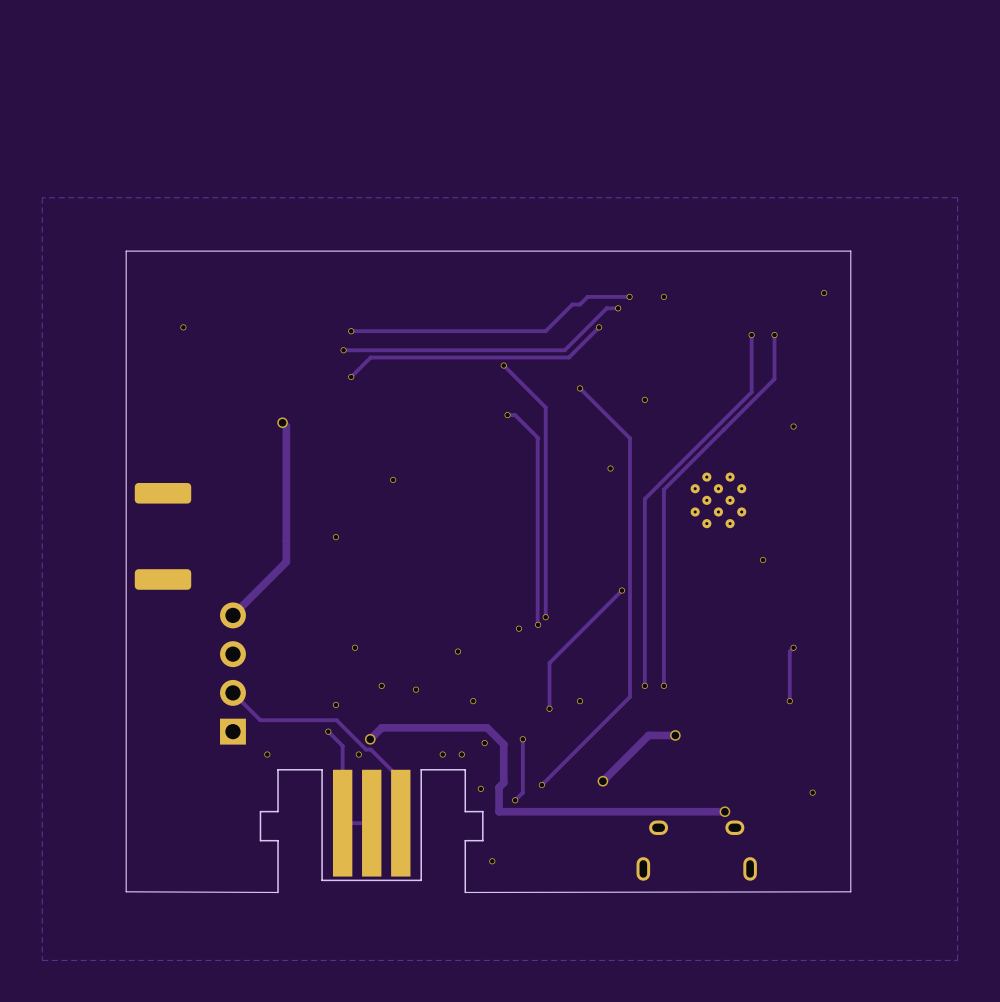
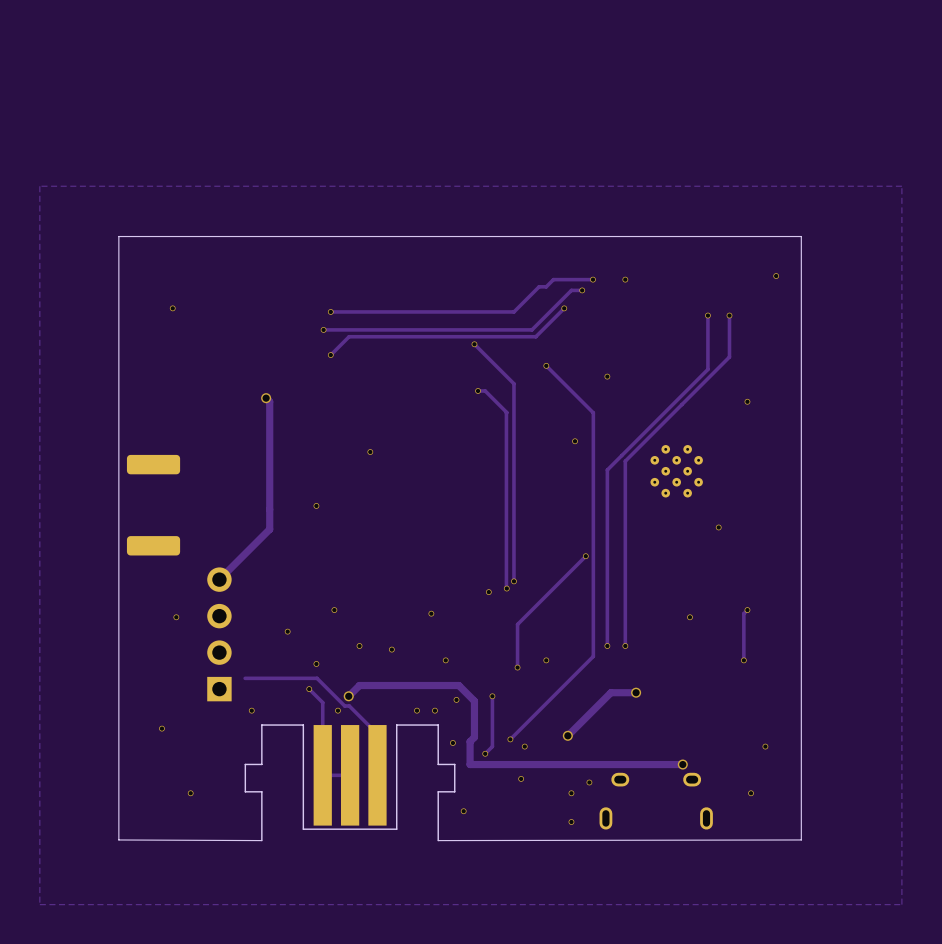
via: none -> (176, 617)
via: none -> (689, 617)
via: none -> (287, 631)
track: (232, 692) (260, 720) -> none
via: none -> (161, 728)
via: none -> (524, 746)
via: none -> (521, 778)
via: none -> (589, 782)
via: none -> (190, 793)
via: none -> (571, 793)
via: none -> (751, 793)
via: none -> (571, 822)

